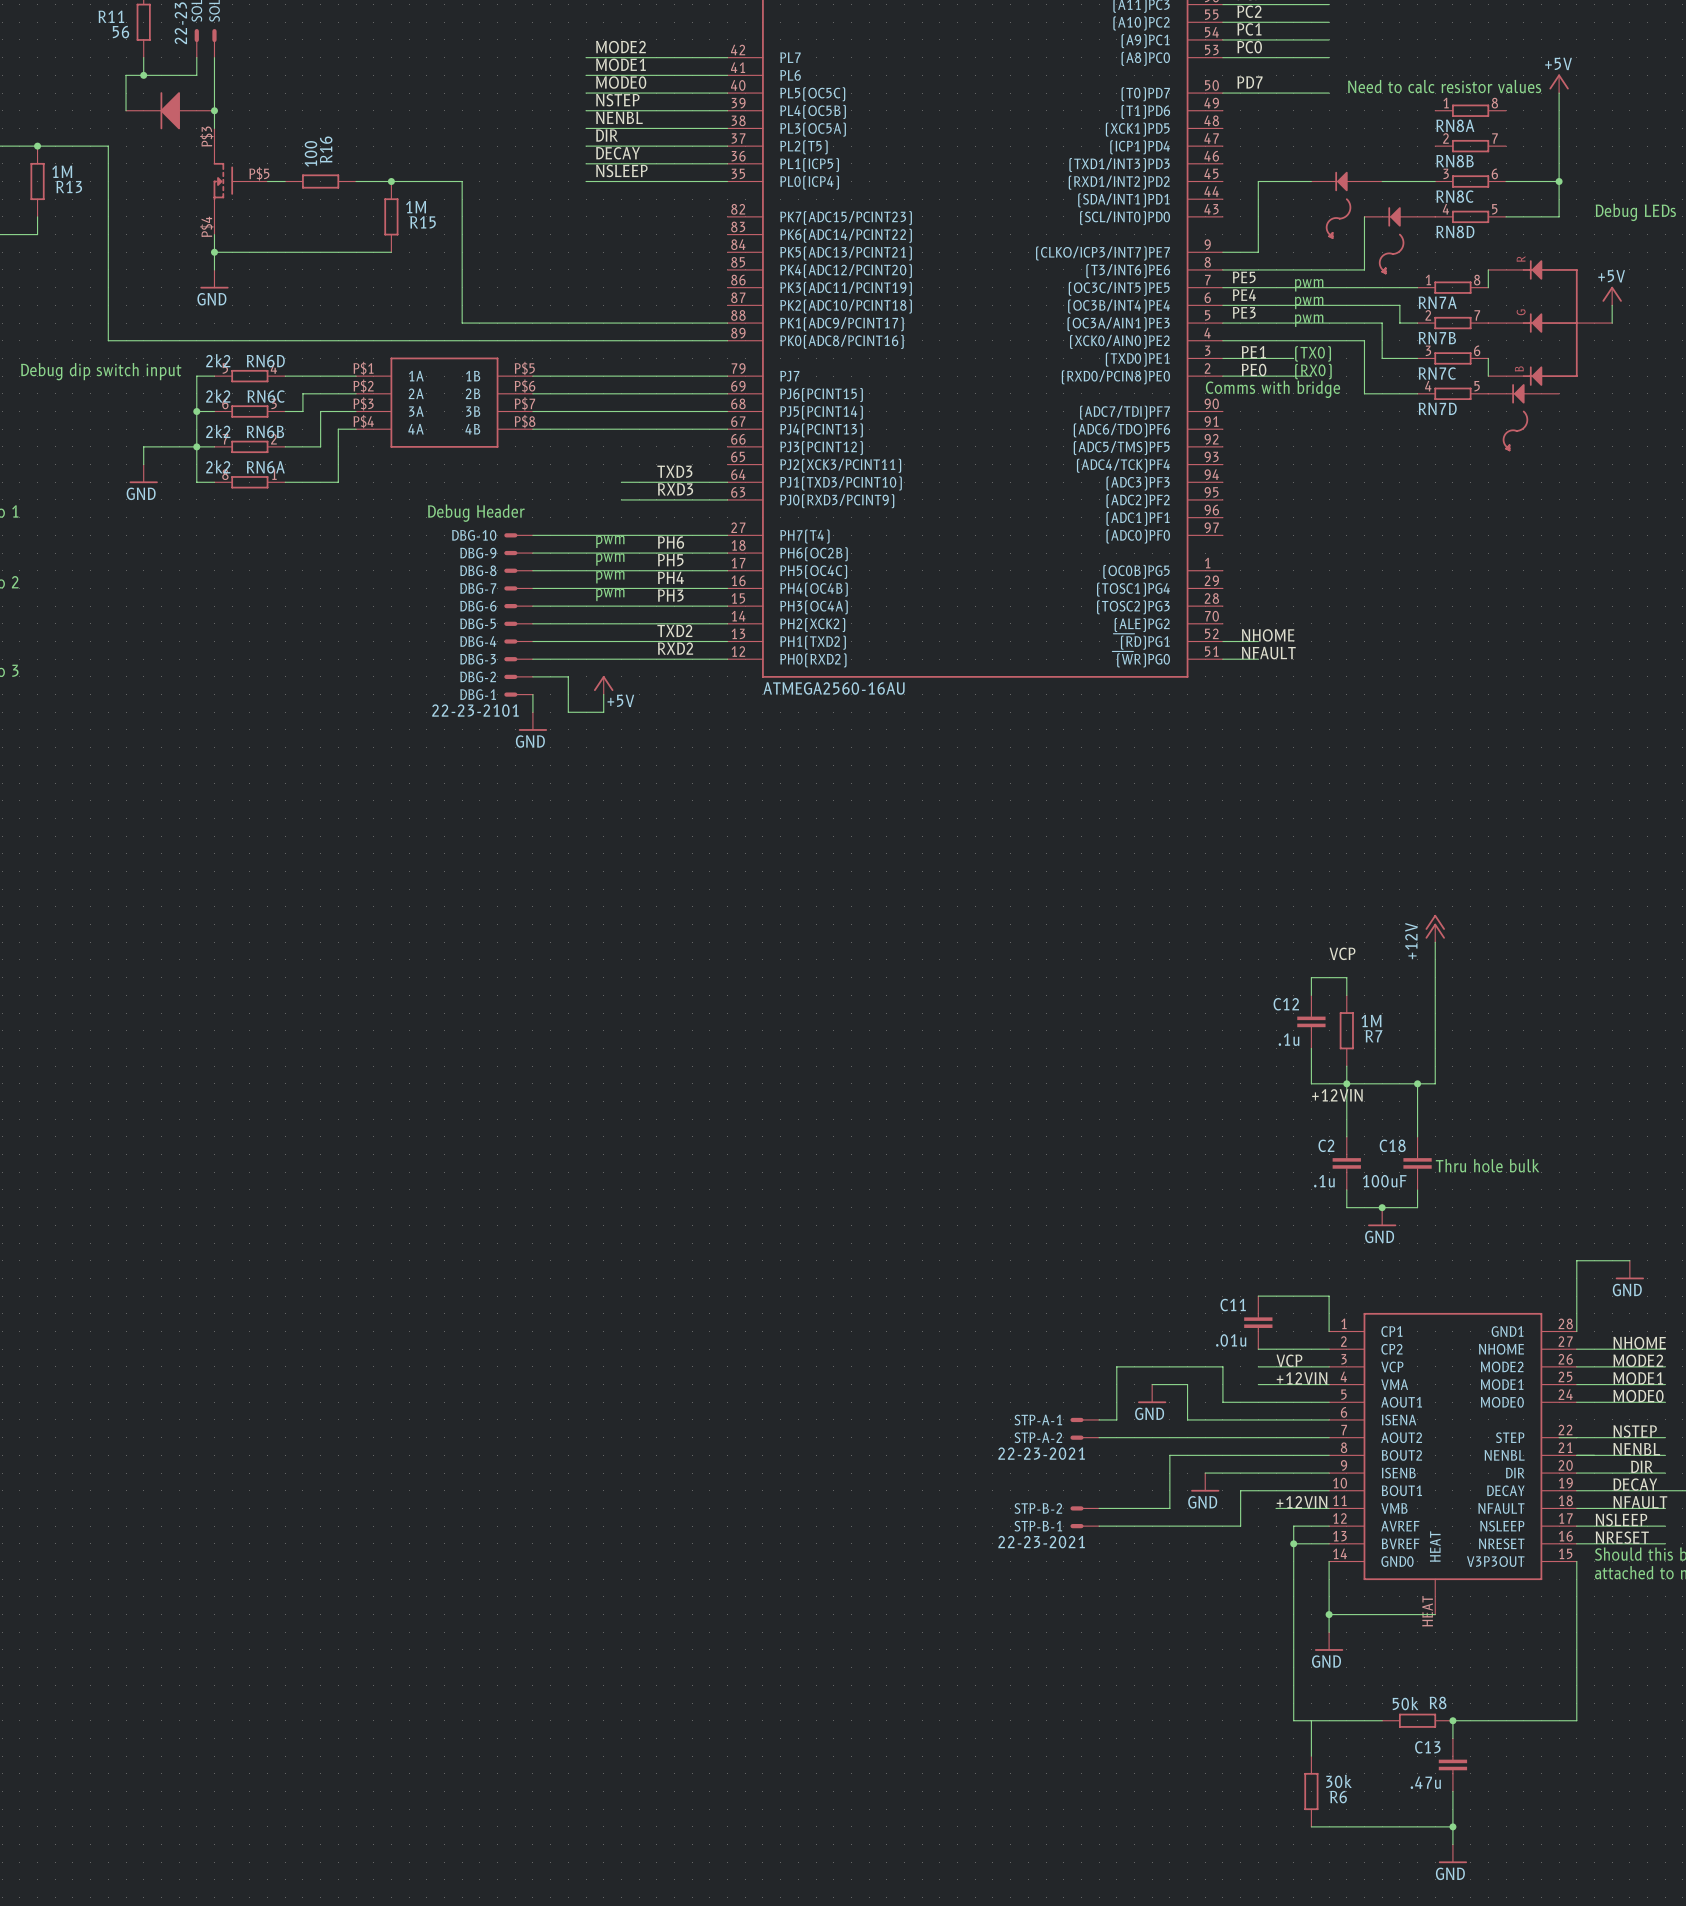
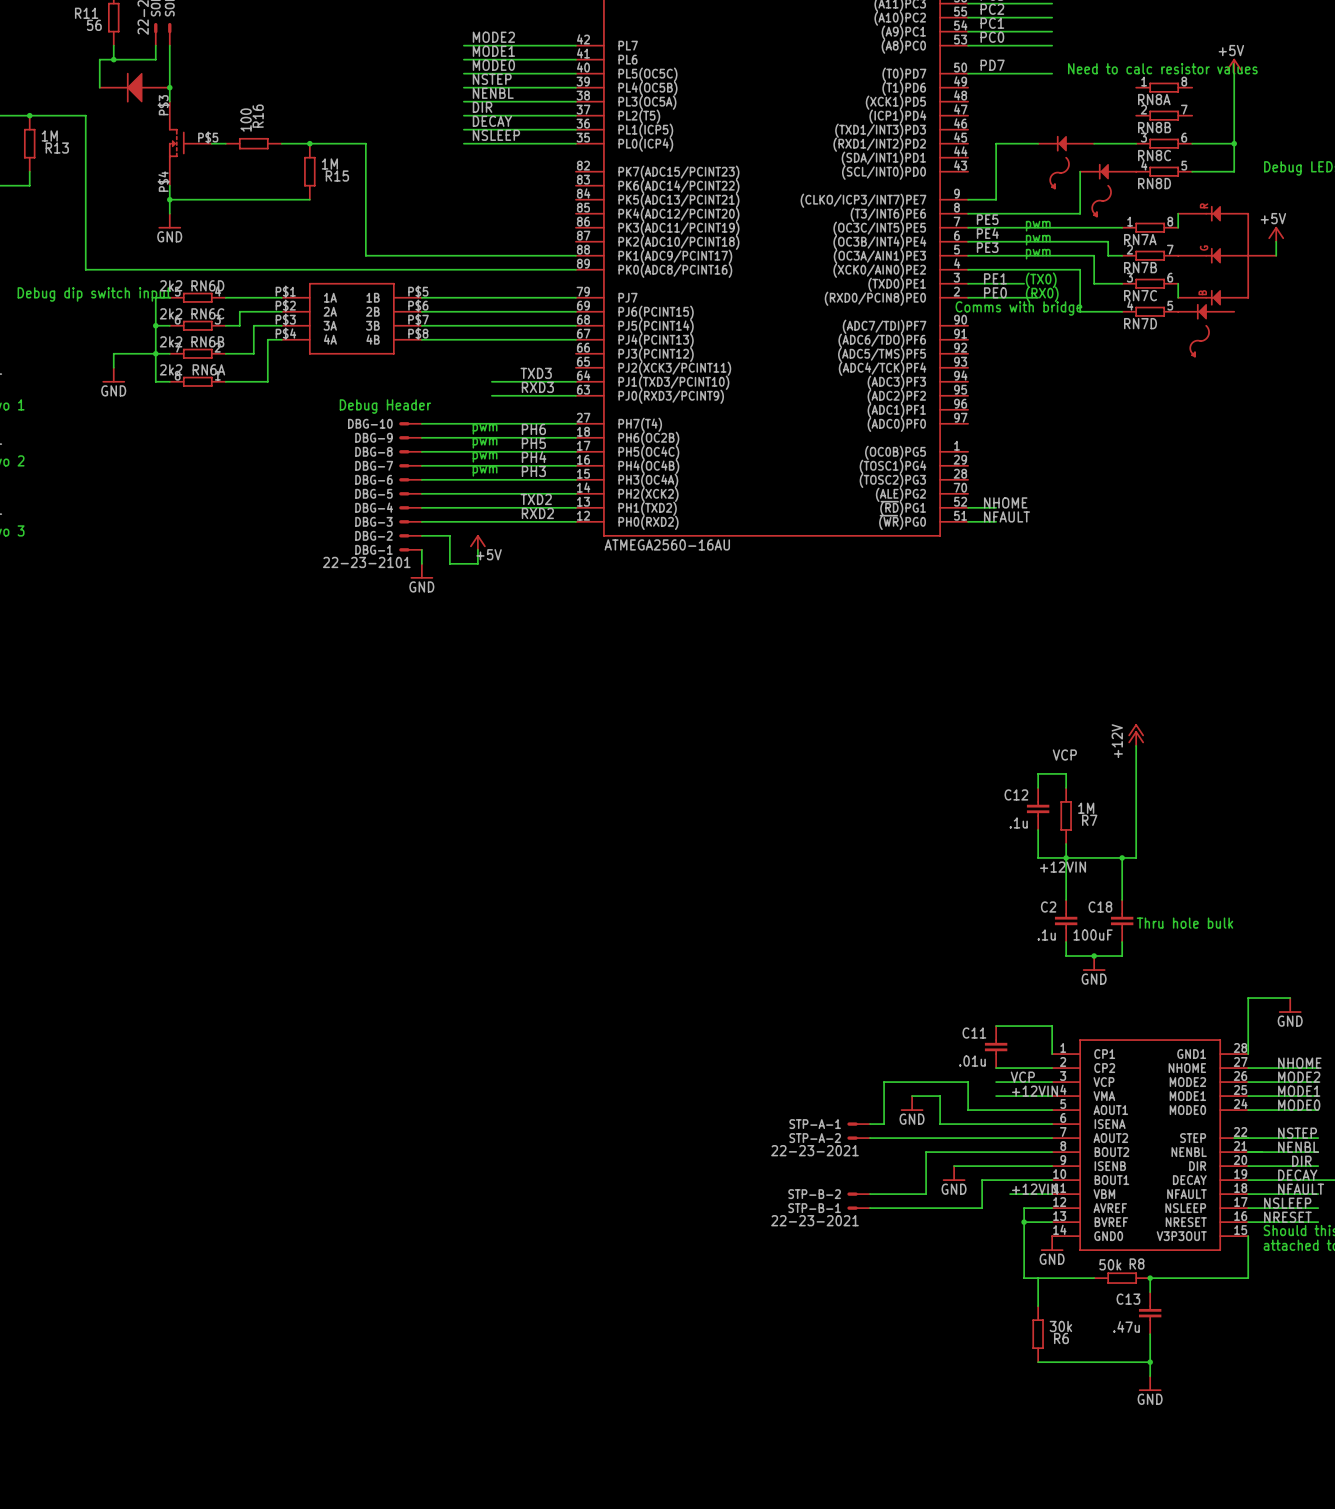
part: none -> (1150, 1145)
part: (1452, 1463) -> none
wire: (1329, 1561) (1329, 1632) -> none
wire: (1293, 1614) (1293, 1720) (1311, 1720) (1311, 1756) -> (1024, 1278) (1052, 1278)
wire: none -> (1038, 1278) (1038, 1306)
junction: (1329, 1614) -> none
wire: (1382, 1614) (1435, 1614) -> none
junction: none -> (1150, 1278)
wire: (1576, 1614) (1576, 1720) (1452, 1720) -> (1248, 1278) (1150, 1278) (1150, 1292)
power symbol position: GND (1329, 1641) -> GND (1052, 1243)
wire: none -> (1150, 1334) (1150, 1362) (1094, 1362)
R8 position: (1417, 1720) -> (1122, 1278)
power symbol: none -> GND (1150, 1383)
C13 position: (1452, 1764) -> (1150, 1313)
R6 position: (1311, 1791) -> (1038, 1334)
wire: (1452, 1791) (1452, 1844) -> none
wire: (1311, 1826) (1452, 1826) -> none
junction: (1452, 1826) -> none
power symbol: GND (1452, 1853) -> none

